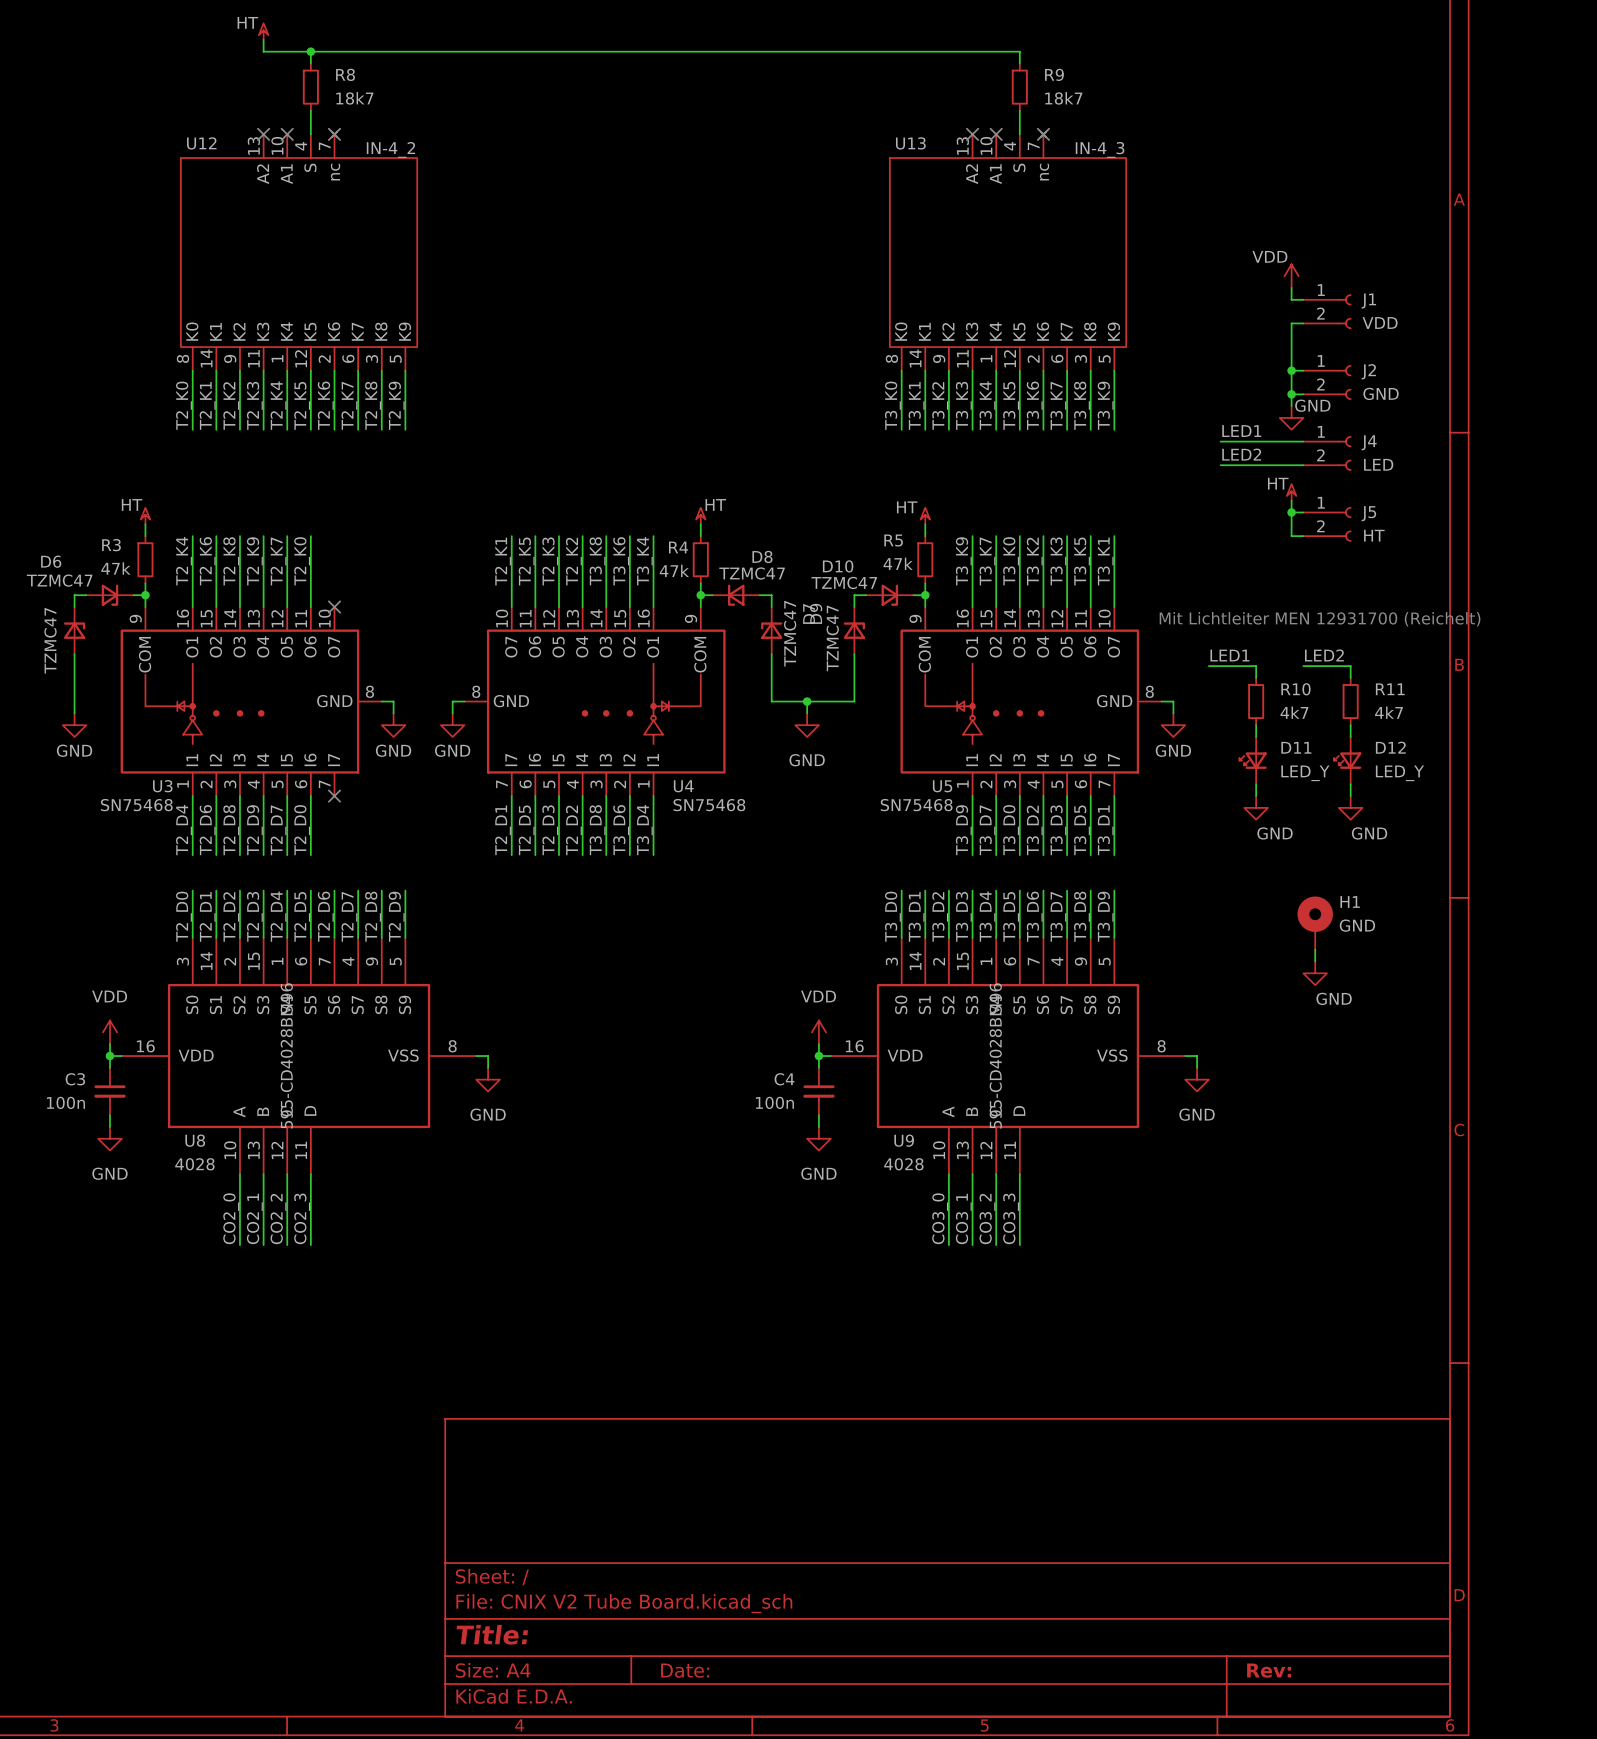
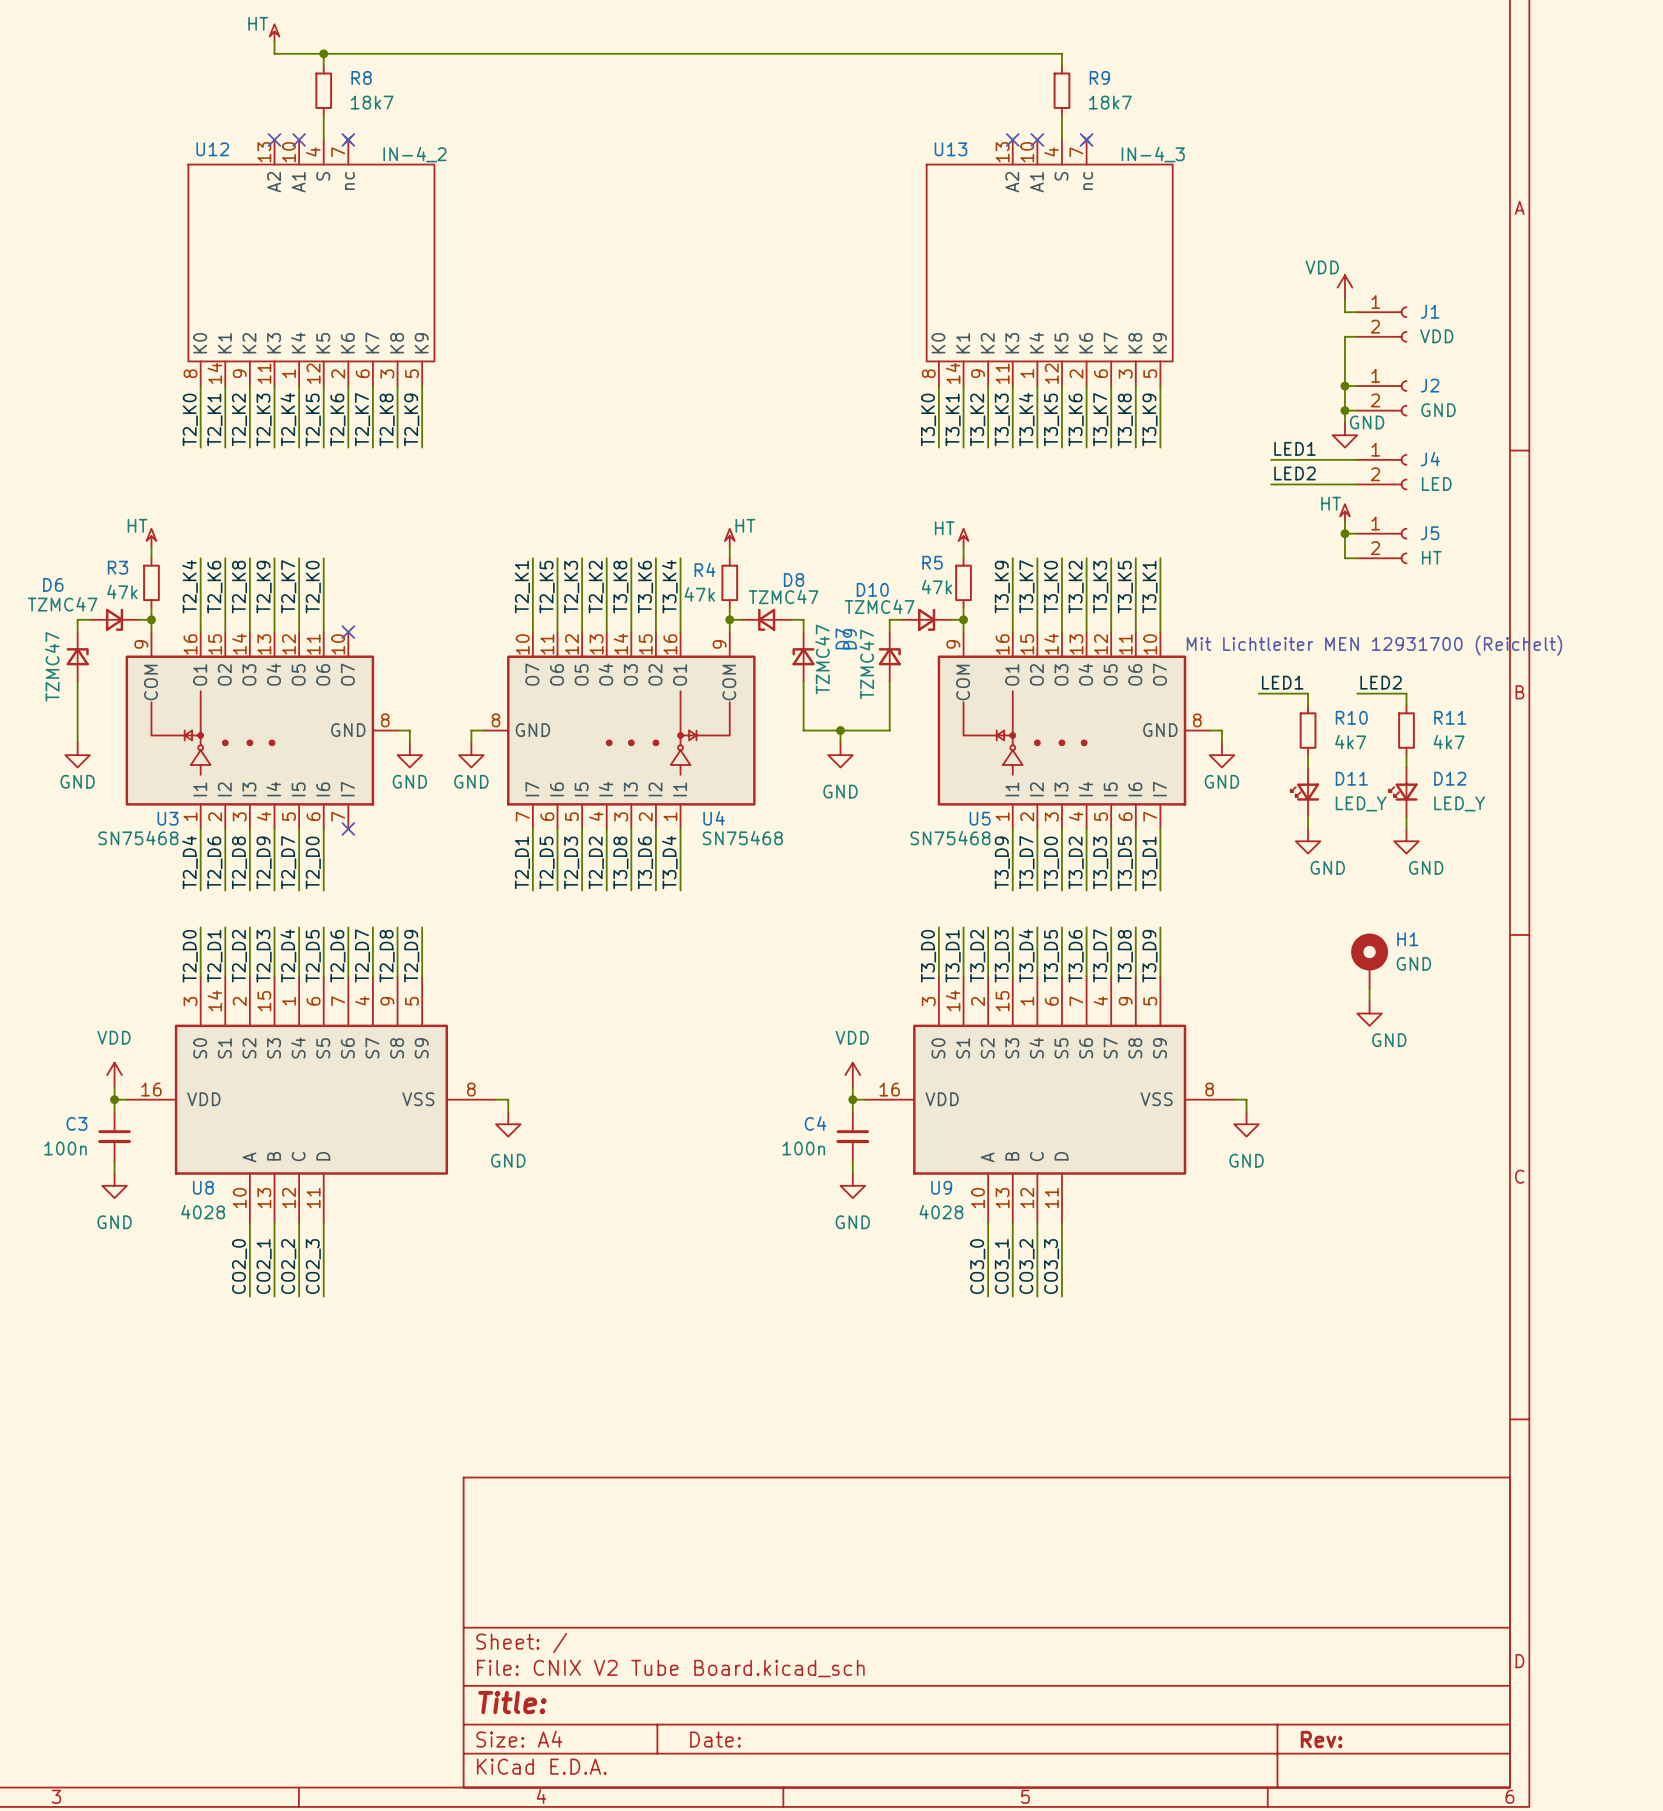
U8 text: 595-CD4028BM96 (286, 1055) -> none
U9 text: 595-CD4028BM96 (995, 1055) -> none

